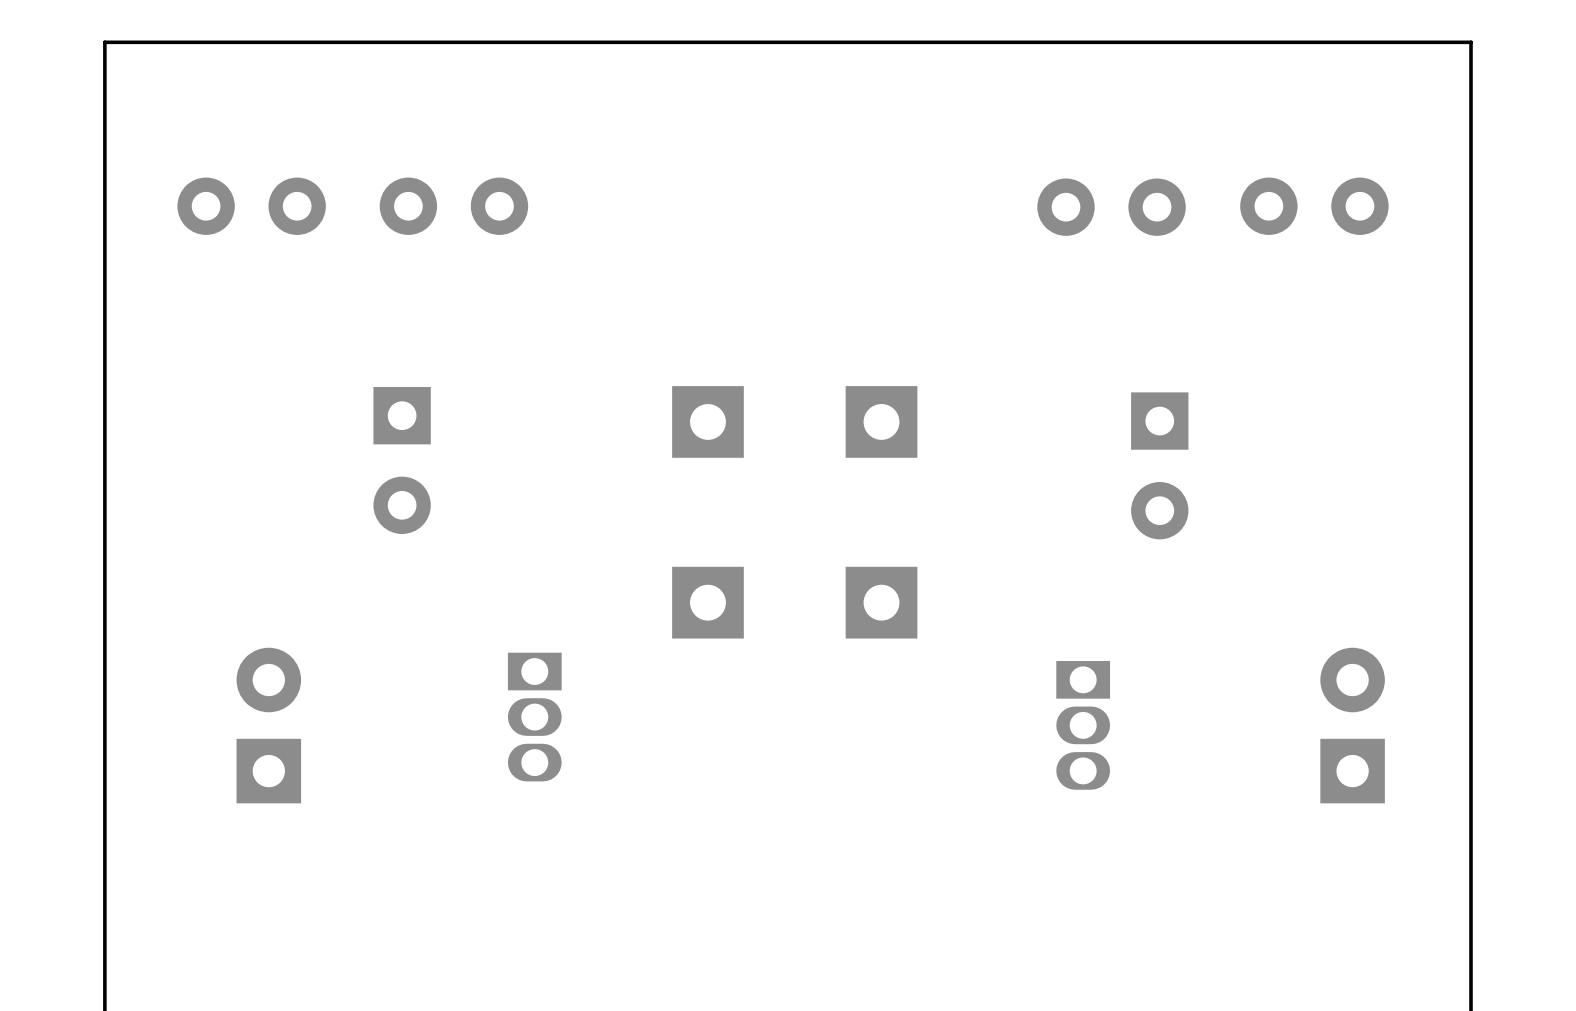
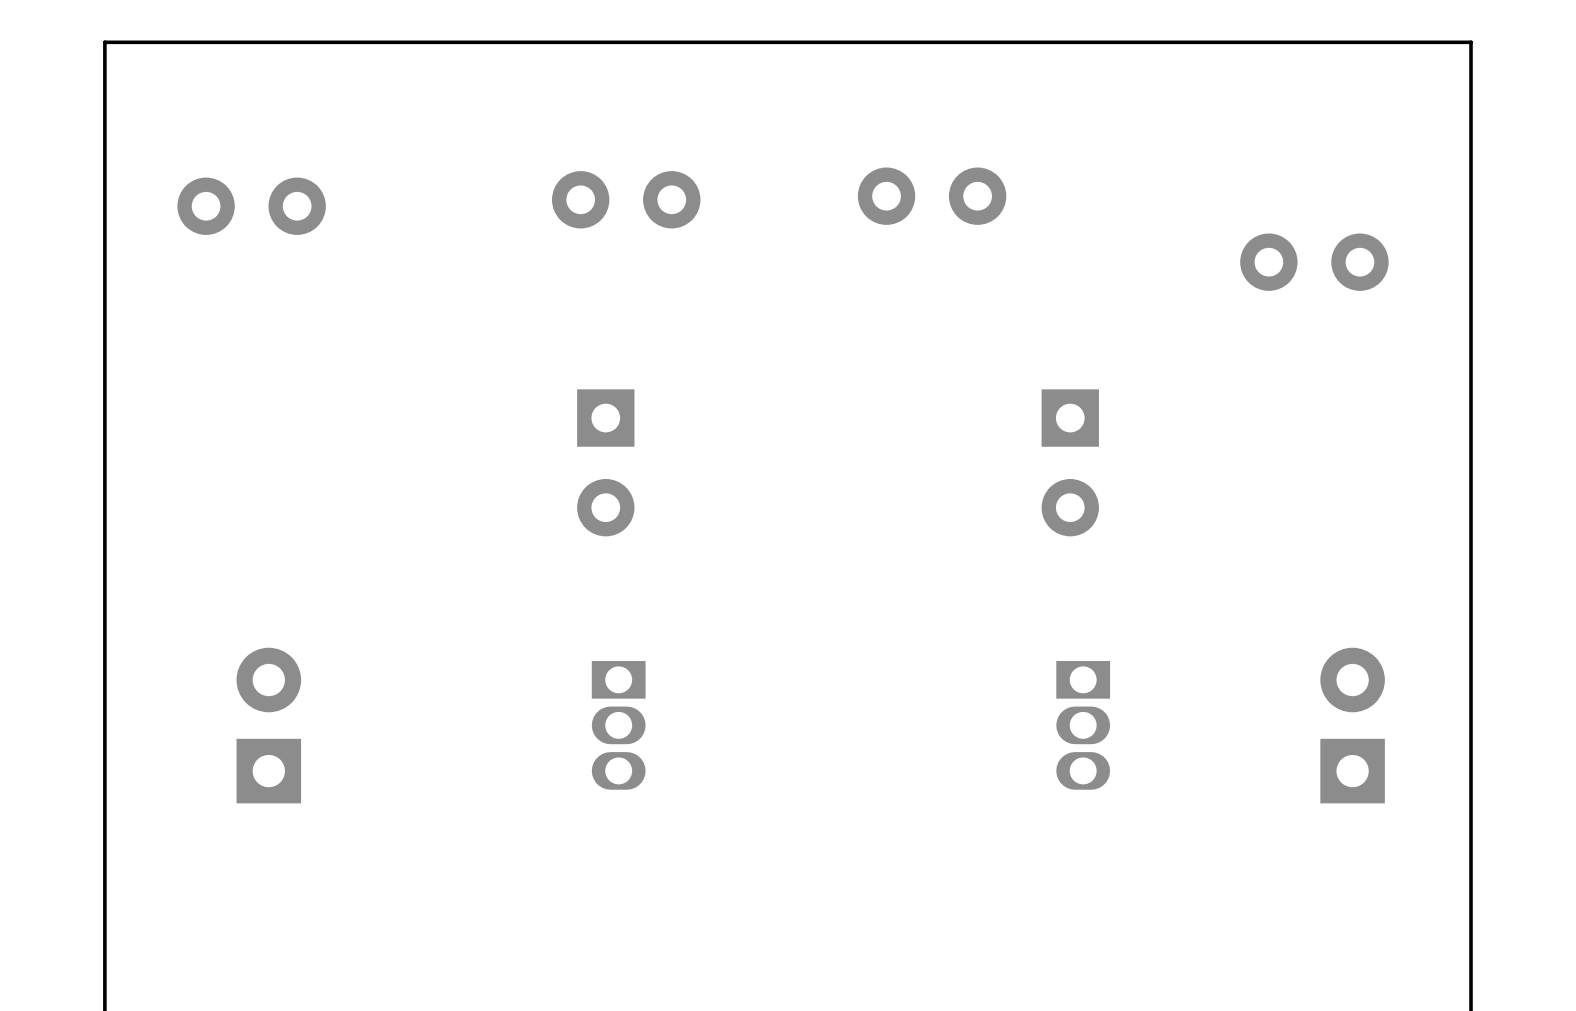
part: none -> (932, 196)
part position: (453, 206) -> (626, 199)
part position: (1314, 206) -> (1314, 262)
part: (1111, 207) -> none
part: (707, 421) -> none
part: (881, 421) -> none
part position: (402, 460) -> (605, 462)
part position: (1159, 465) -> (1070, 462)
part: (707, 602) -> none
part: (881, 602) -> none
part position: (534, 717) -> (618, 725)

